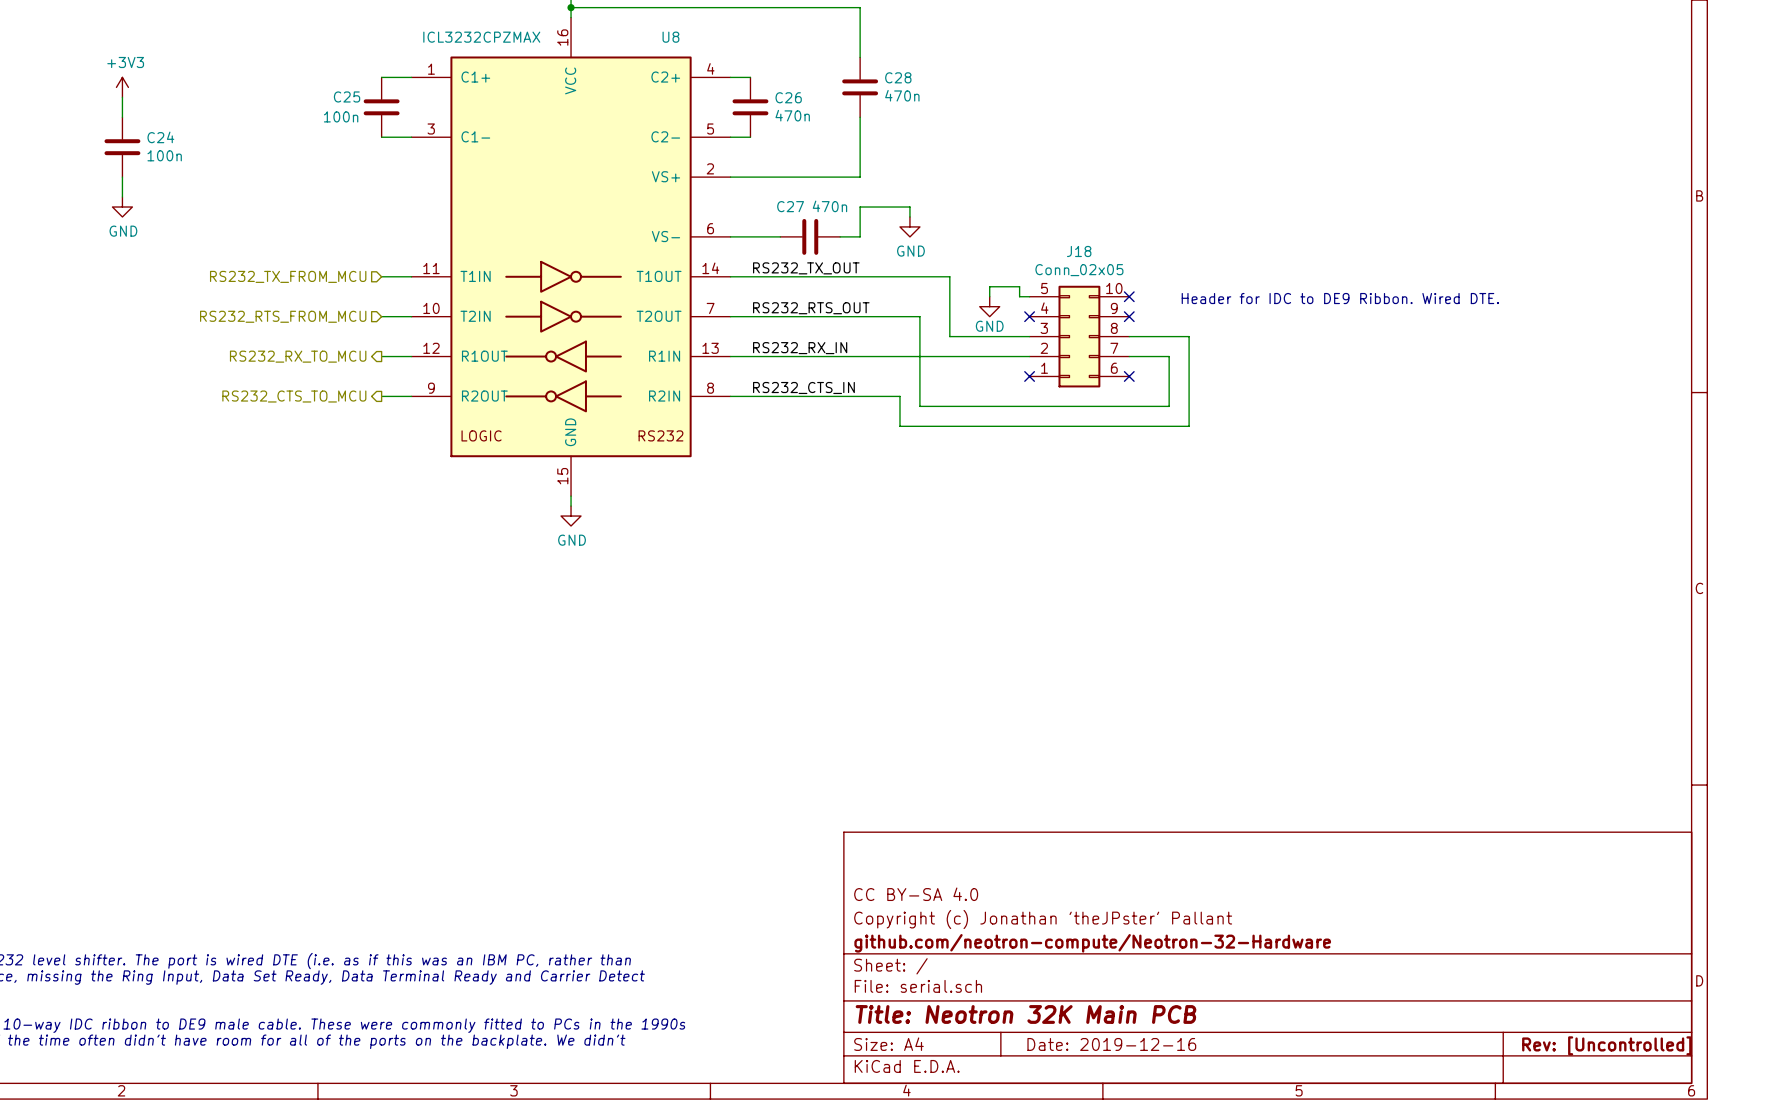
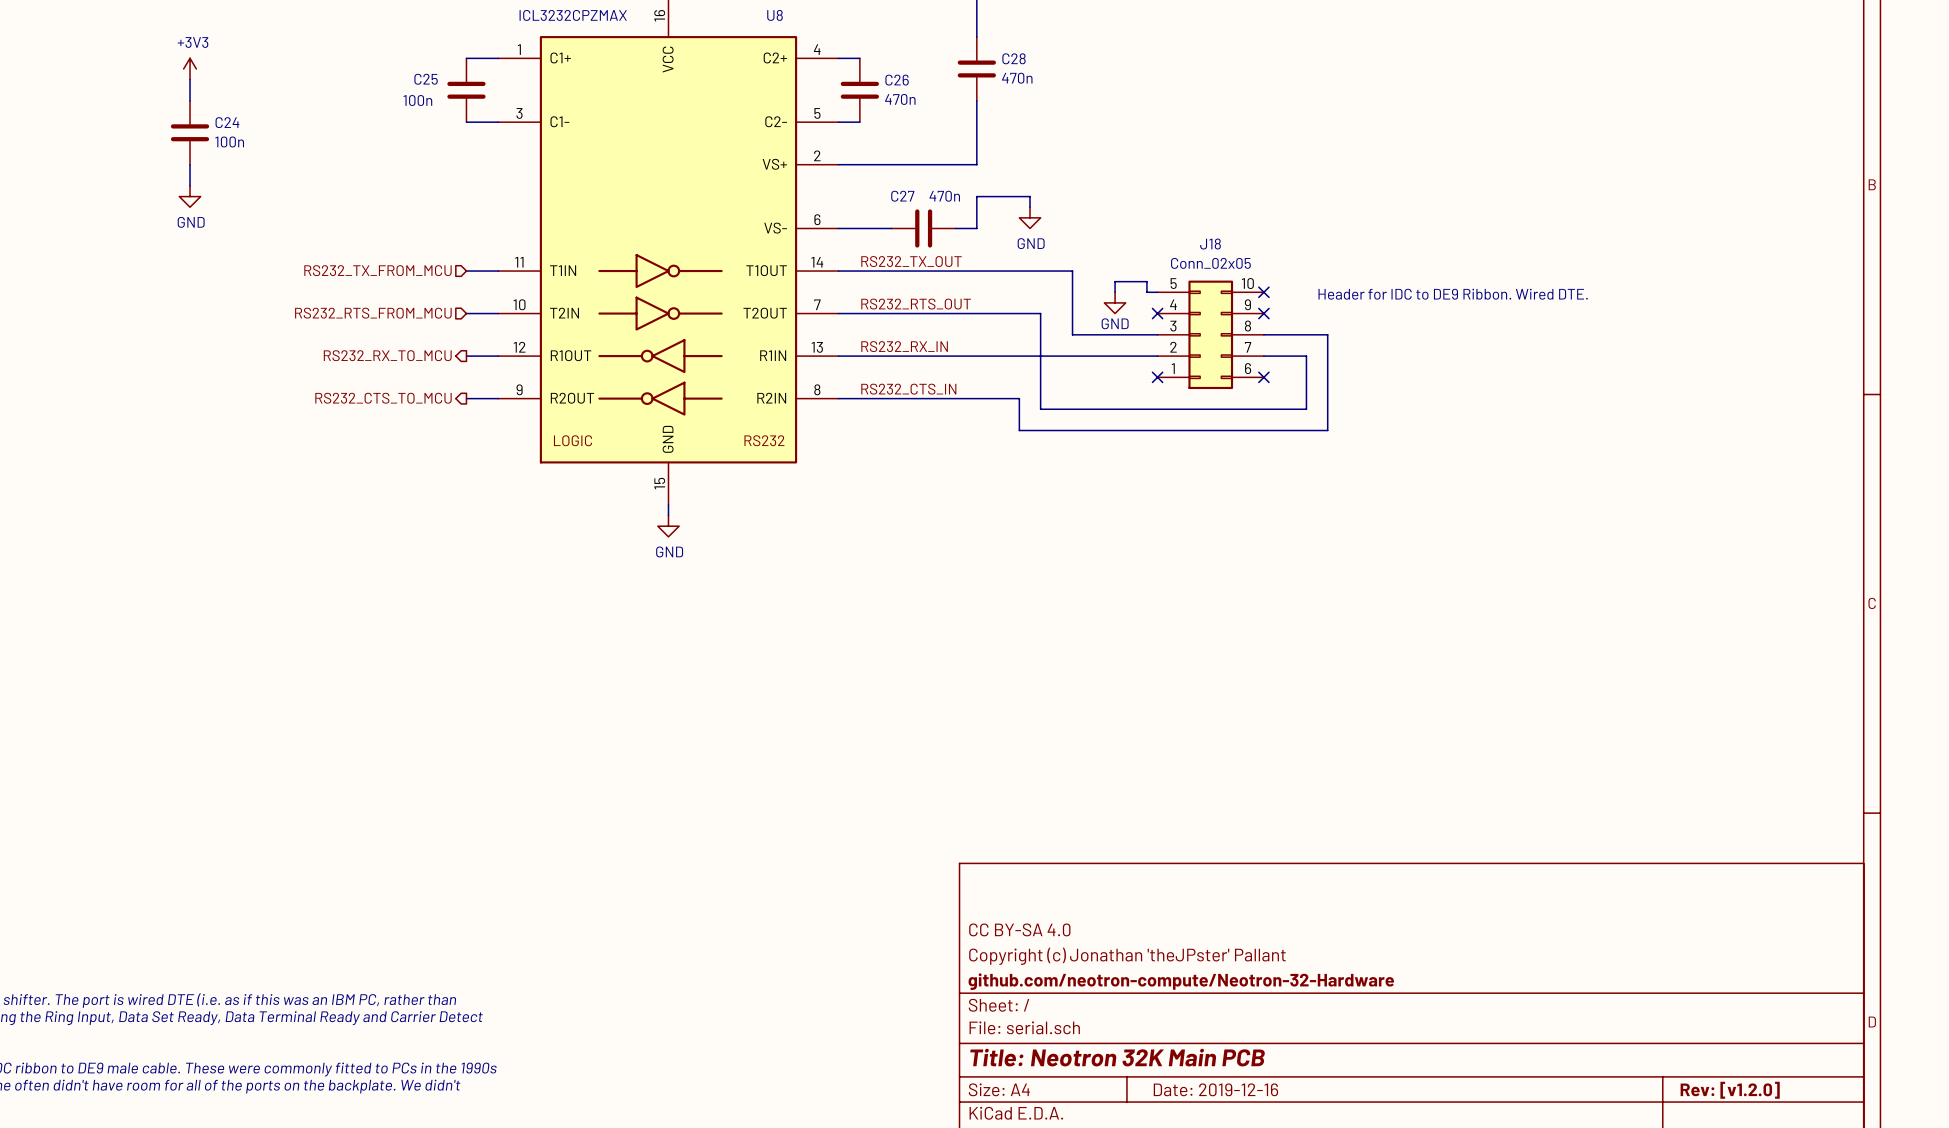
title block: Rev: [Uncontrolled] (1606, 1045) -> Rev: [v1.2.0] (1730, 1090)

